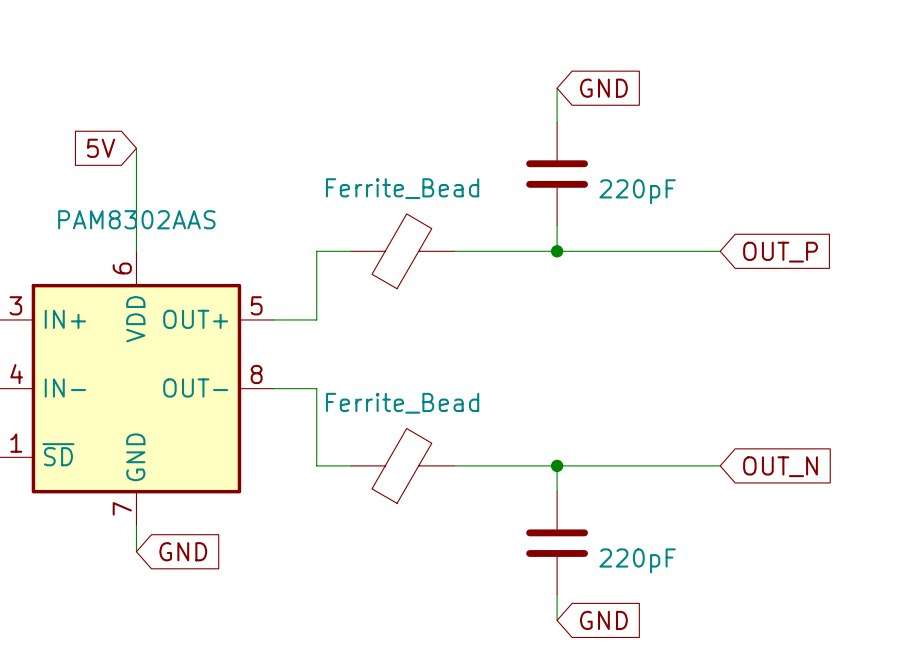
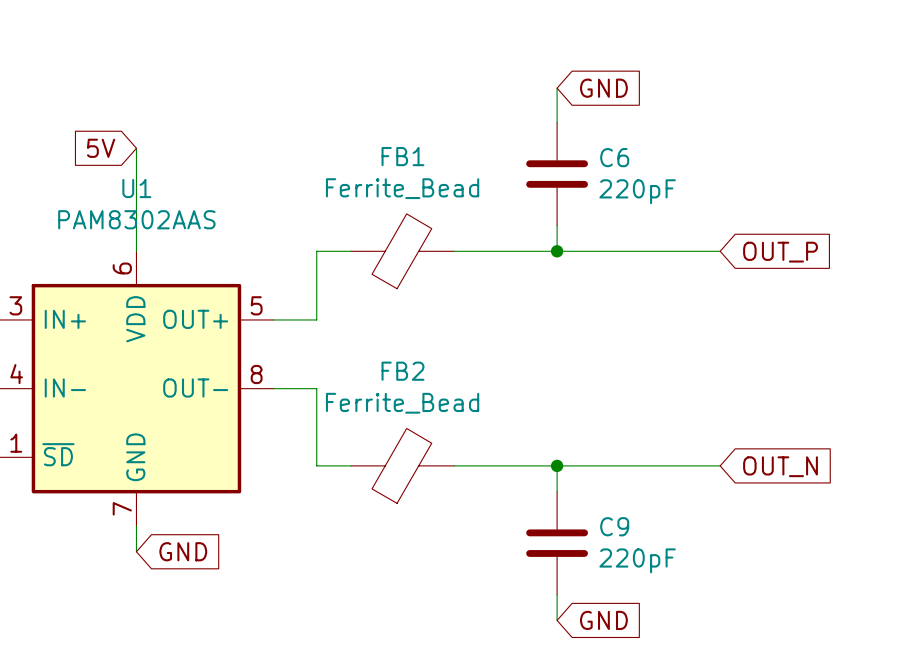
FB1 name: none -> FB1 (402, 156)
C6 name: none -> C6 (614, 157)
U1 name: none -> U1 (136, 188)
FB2 name: none -> FB2 (402, 371)
C9 name: none -> C9 (614, 526)

